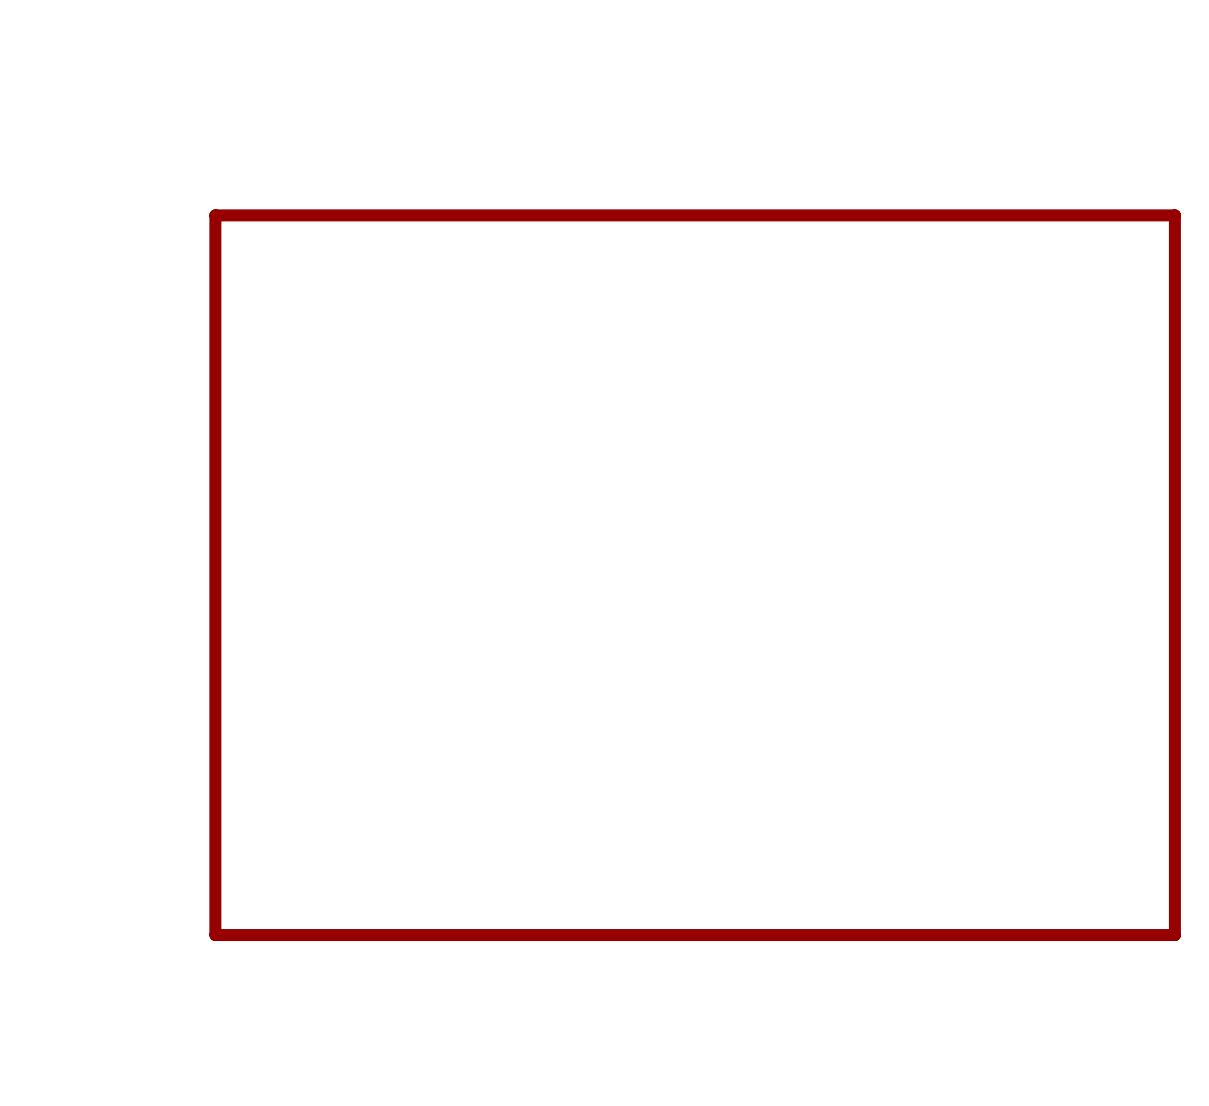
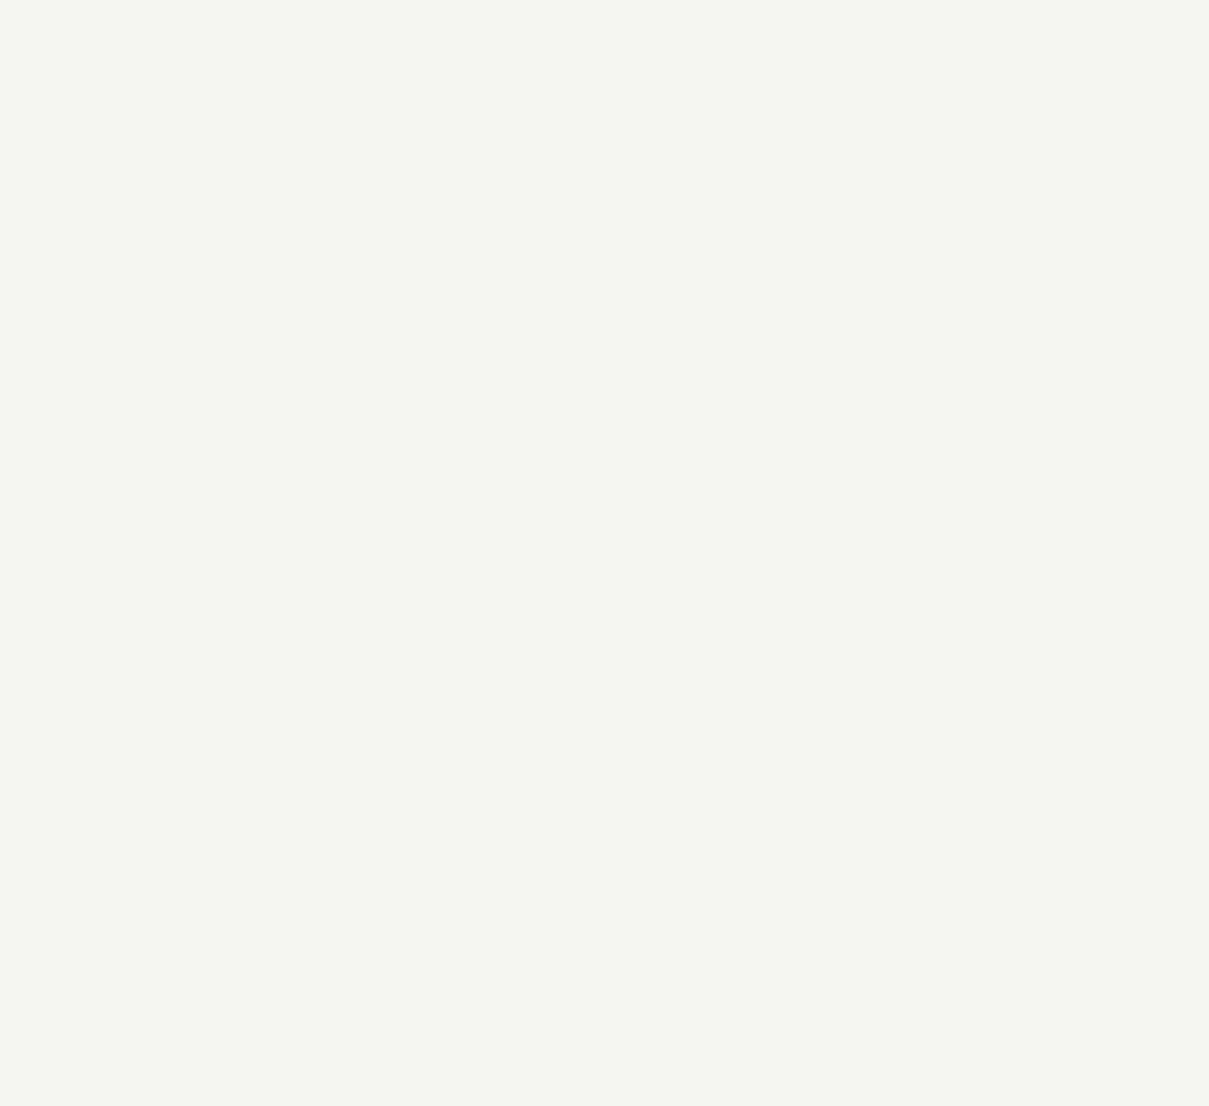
part: (695, 575) -> none

